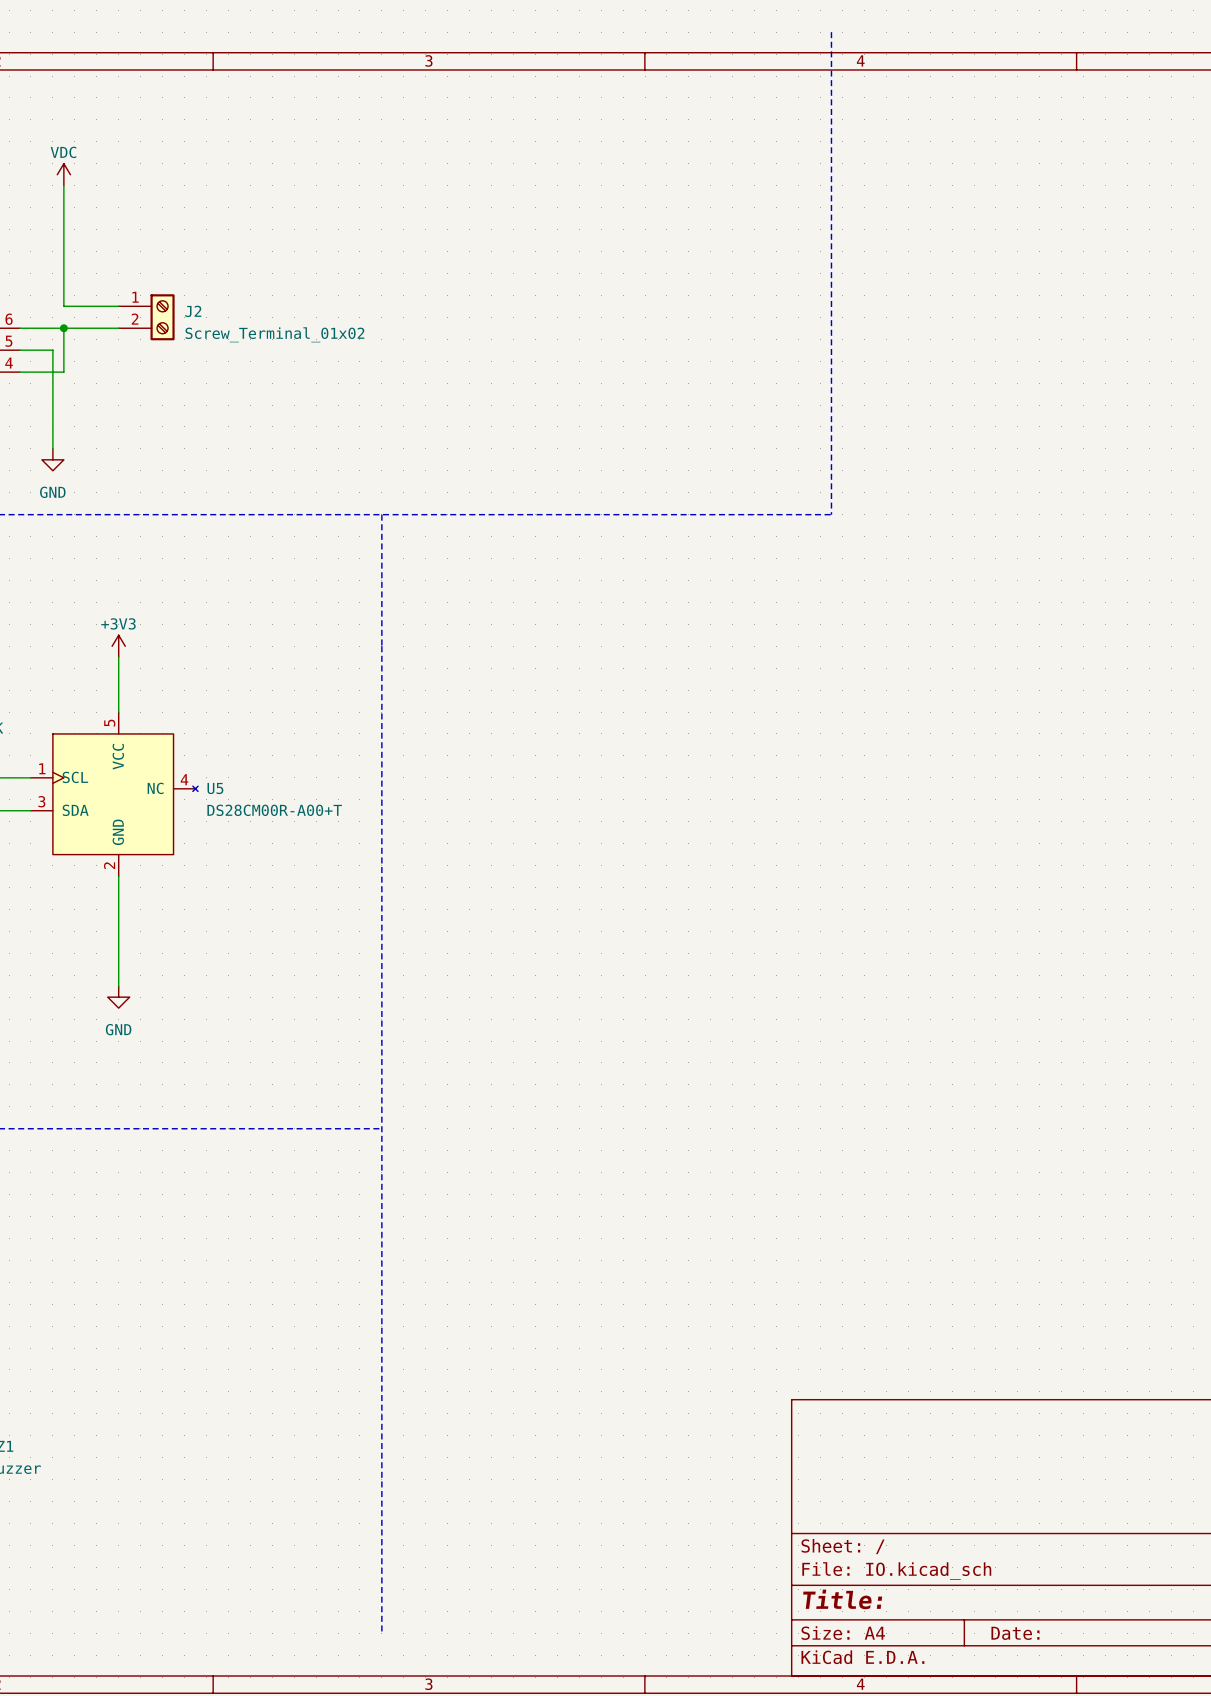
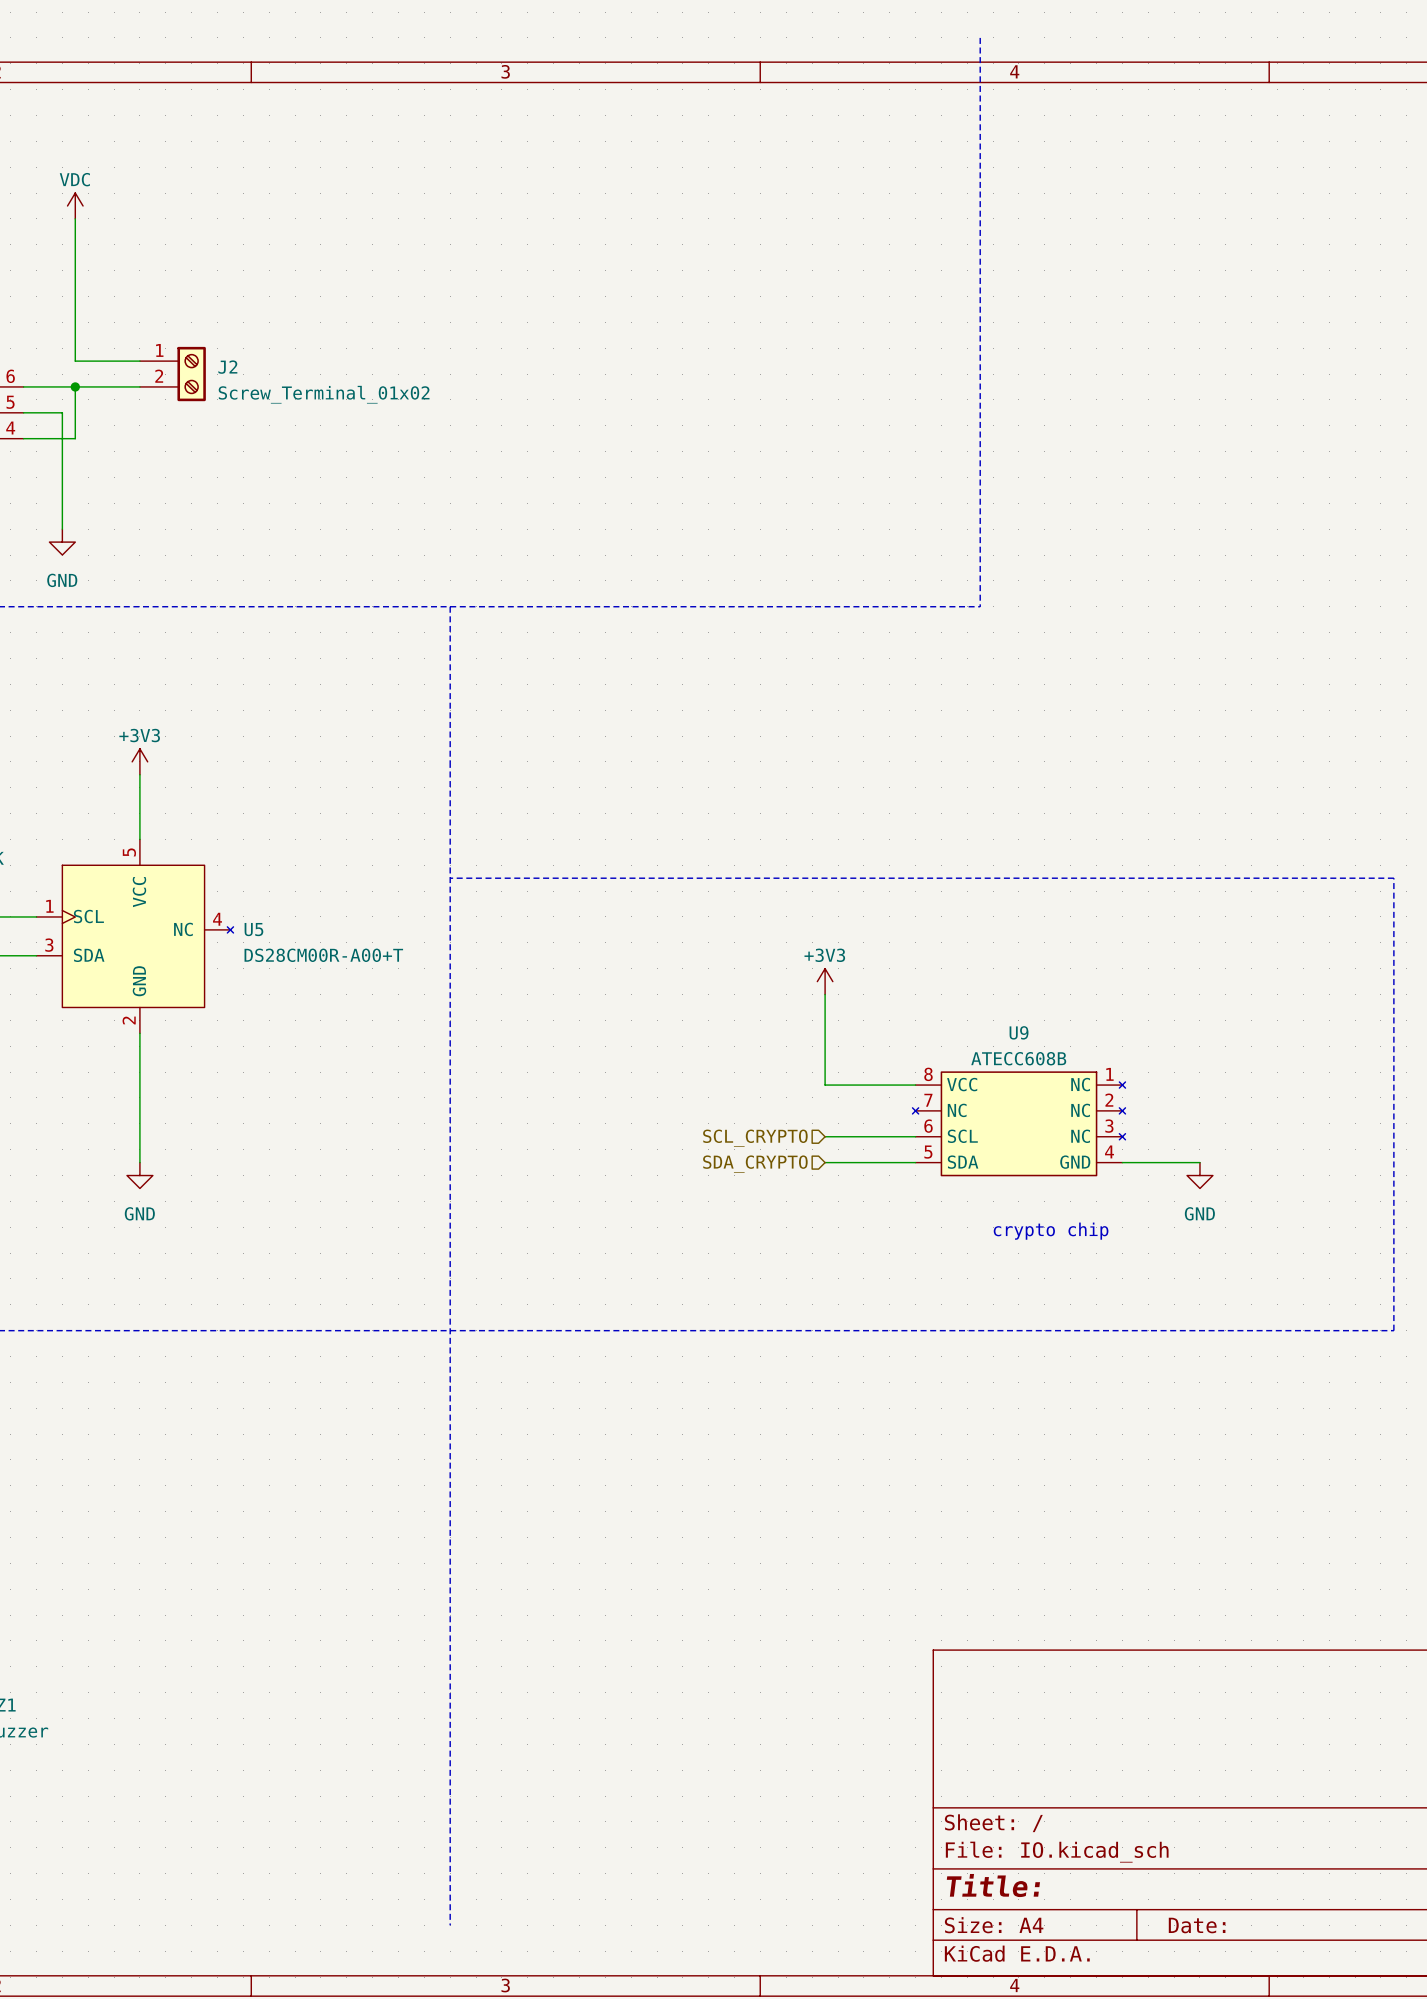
line: none -> (450, 878) (1393, 878) (1393, 1330) (450, 1330)
power symbol: none -> +3V3 (825, 981)
wire: none -> (825, 994) (825, 1085) (915, 1085)
U9: none -> ATECC608B (1018, 1123)
wire: none -> (825, 1136) (915, 1136)
hierarchical label: none -> SCL_CRYPTO (755, 1138)
wire: none -> (825, 1162) (915, 1162)
wire: none -> (1122, 1162) (1199, 1162)
hierarchical label: none -> SDA_CRYPTO (755, 1164)
power symbol: none -> GND (1199, 1175)
text: none -> crypto chip (1051, 1231)

